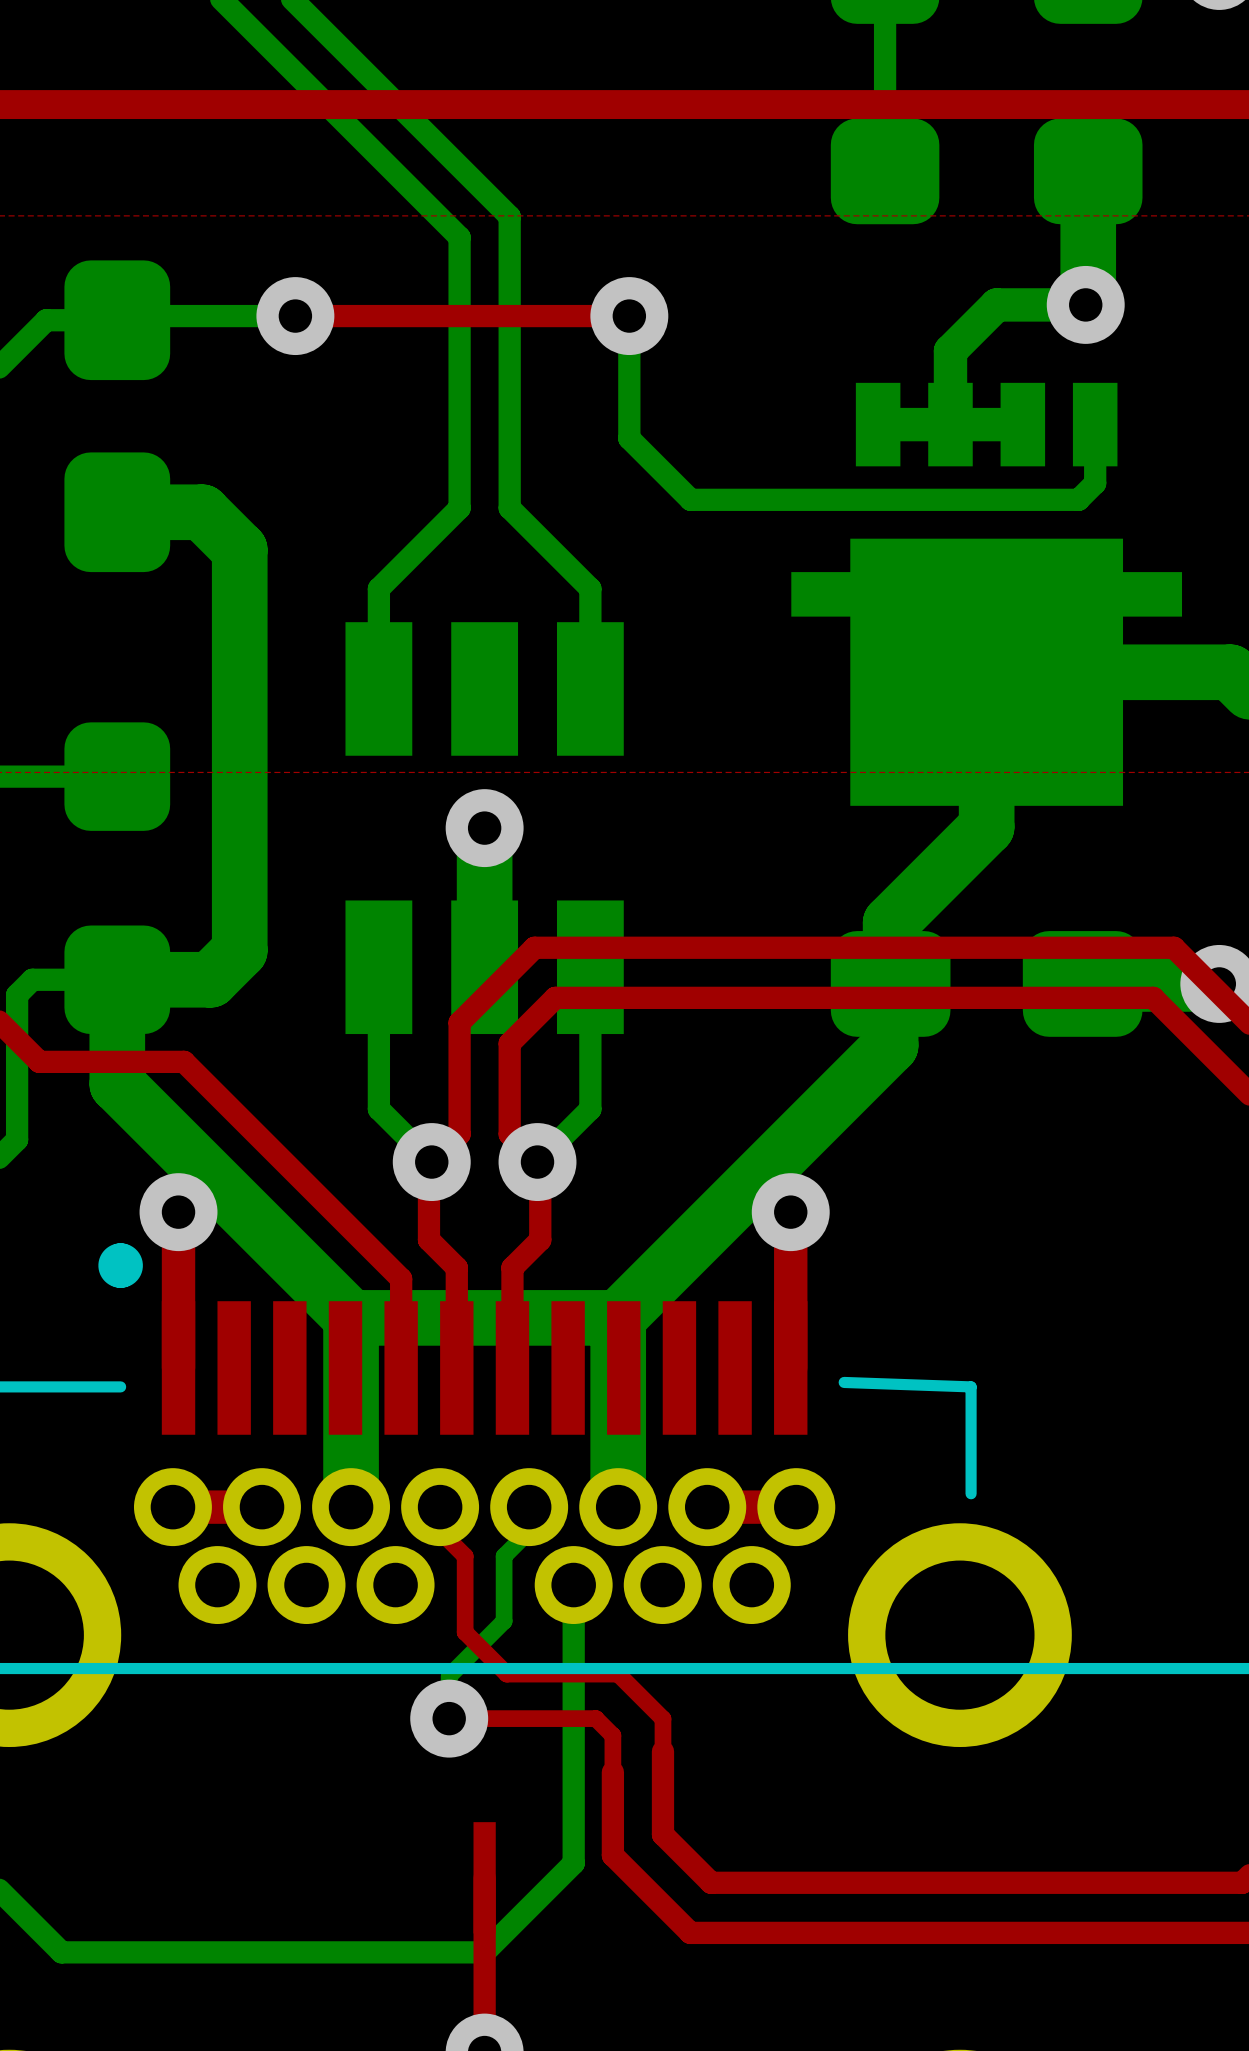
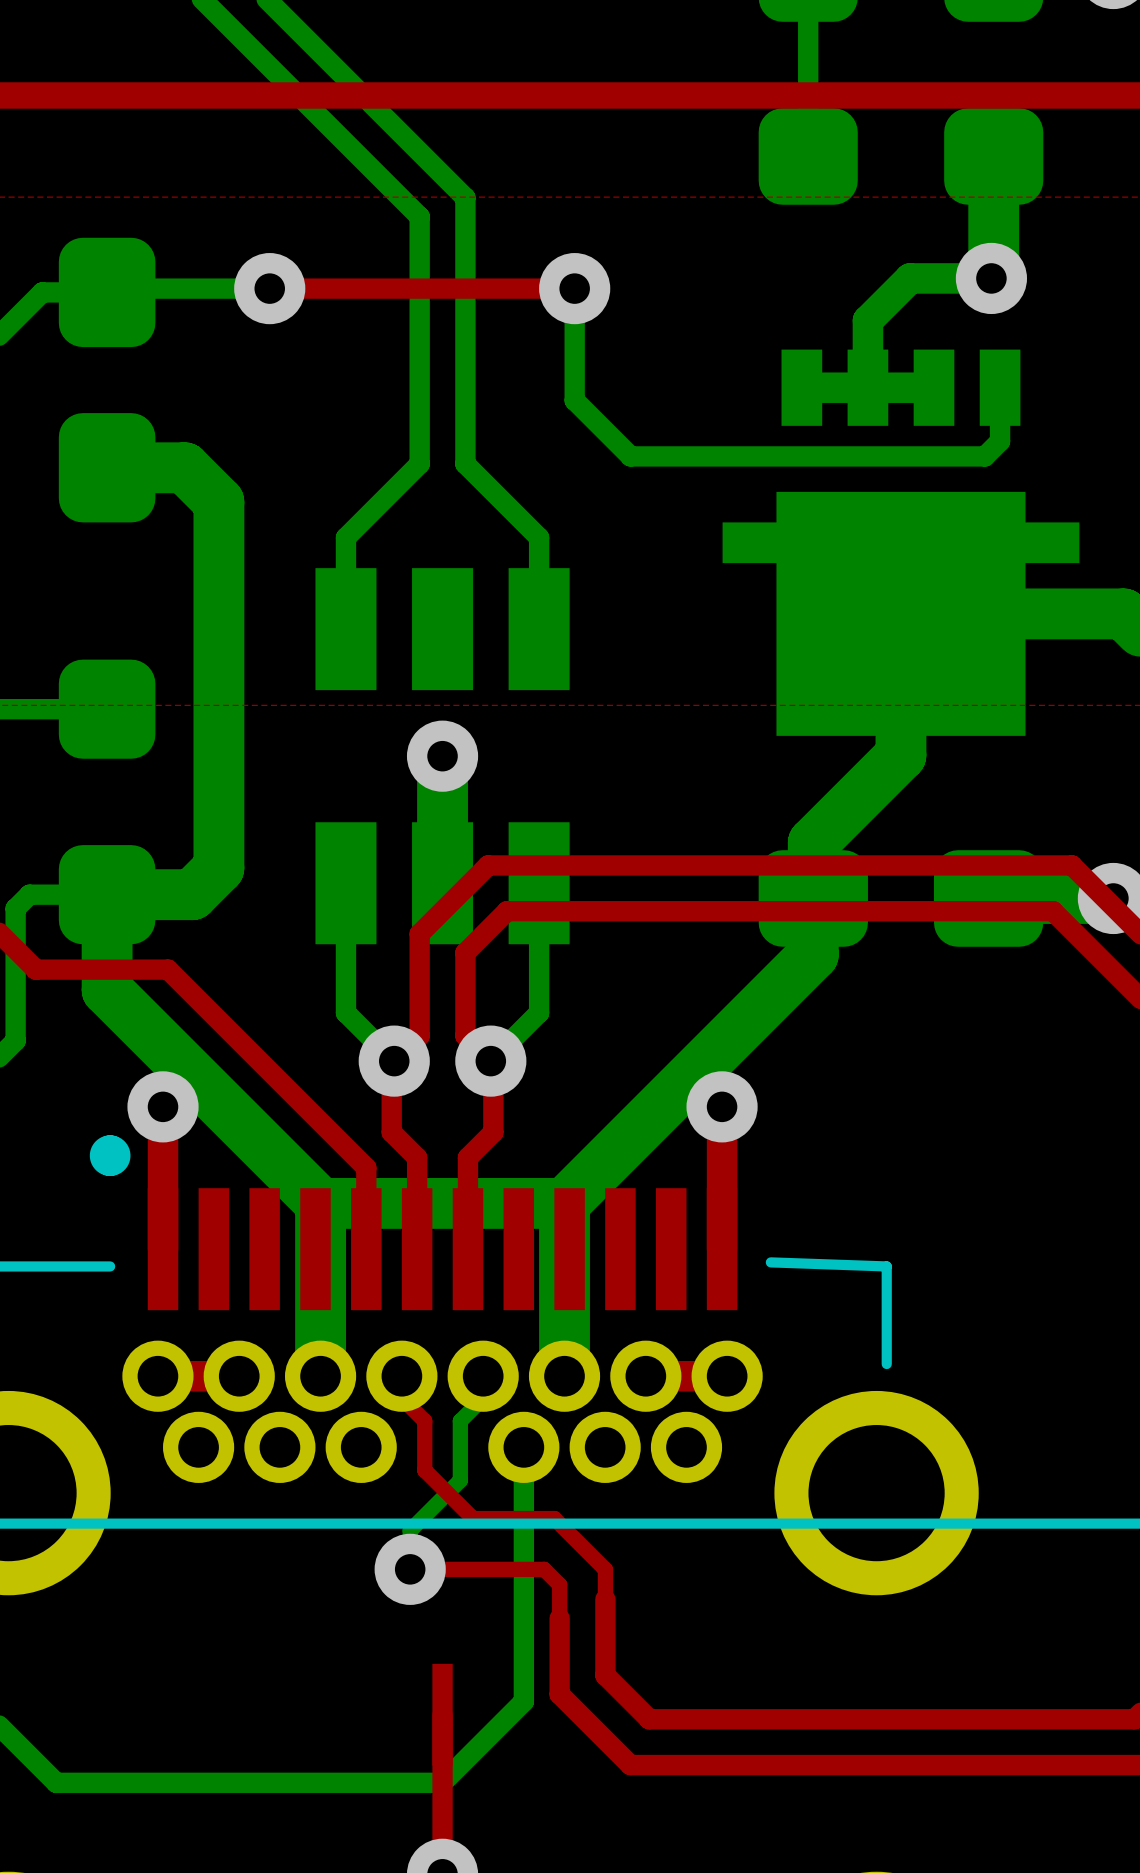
top track: (465, 1610) (465, 1632) (506, 1674) (618, 1674) -> (424, 1470) (473, 1518) (554, 1518) (564, 1528)

